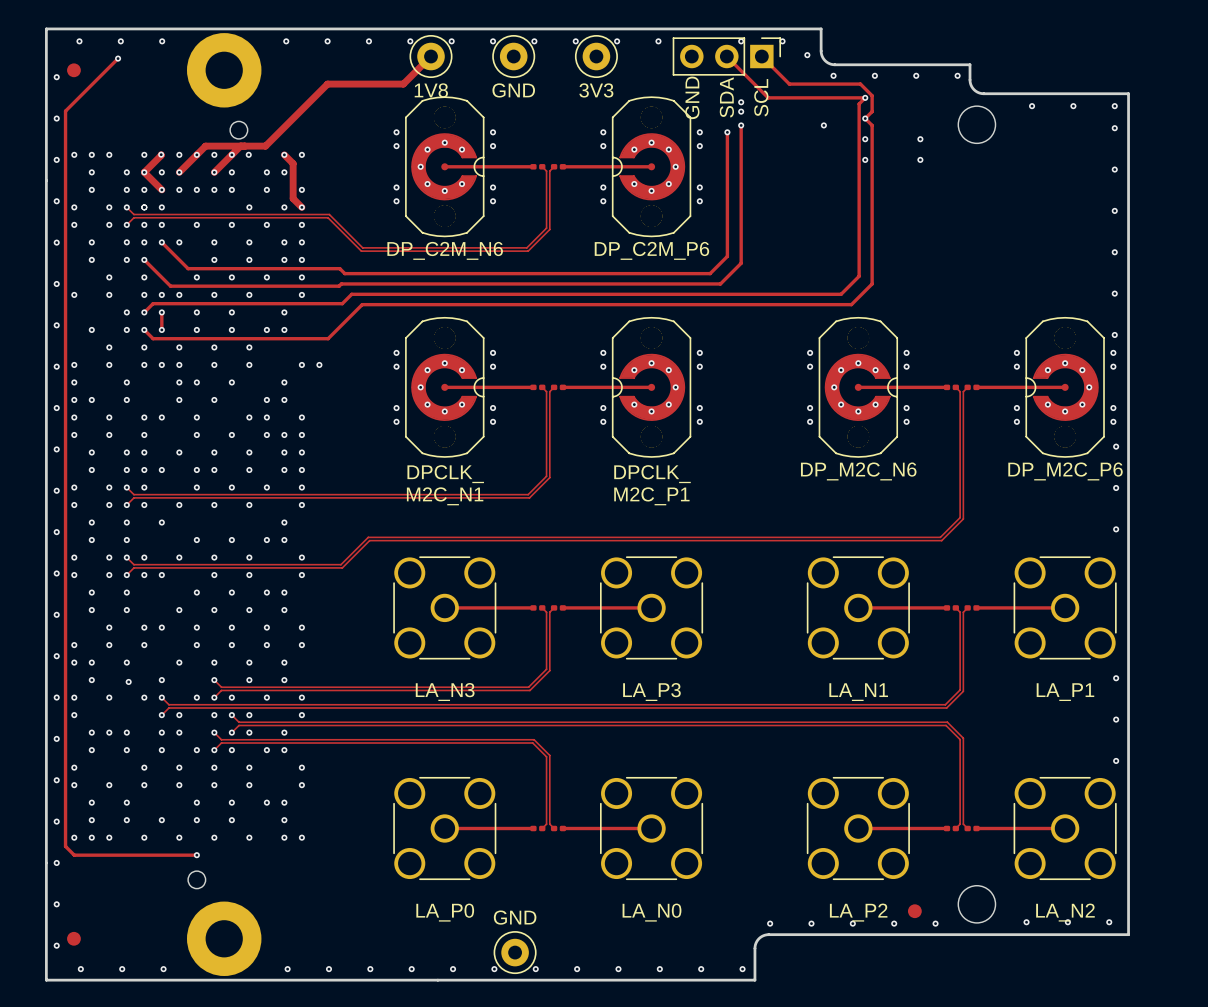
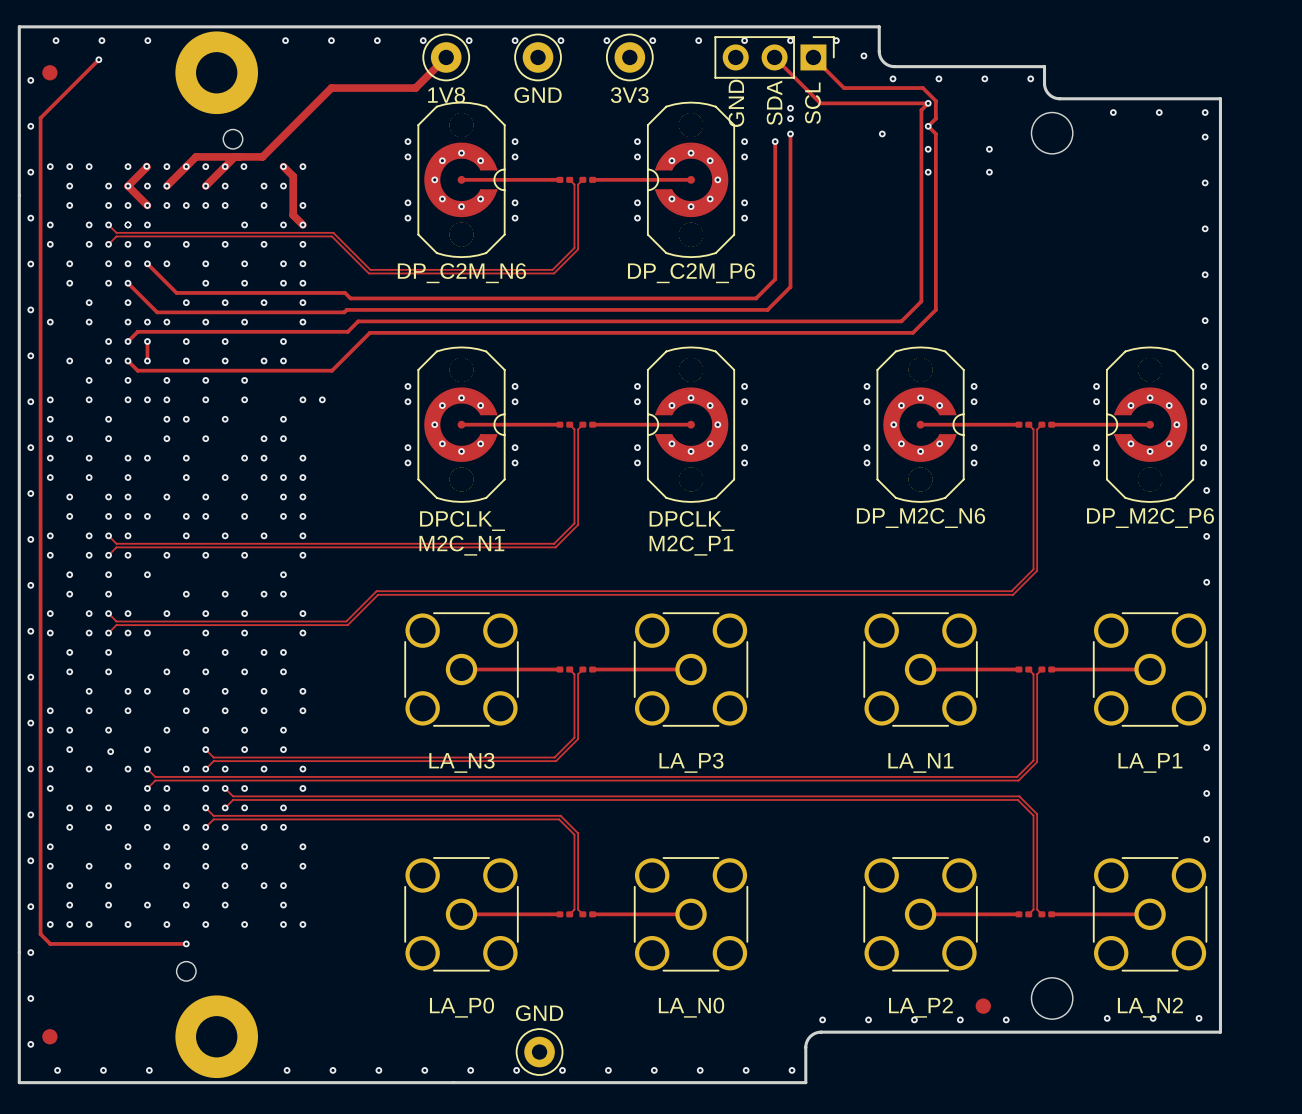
via: none -> (744, 40)

